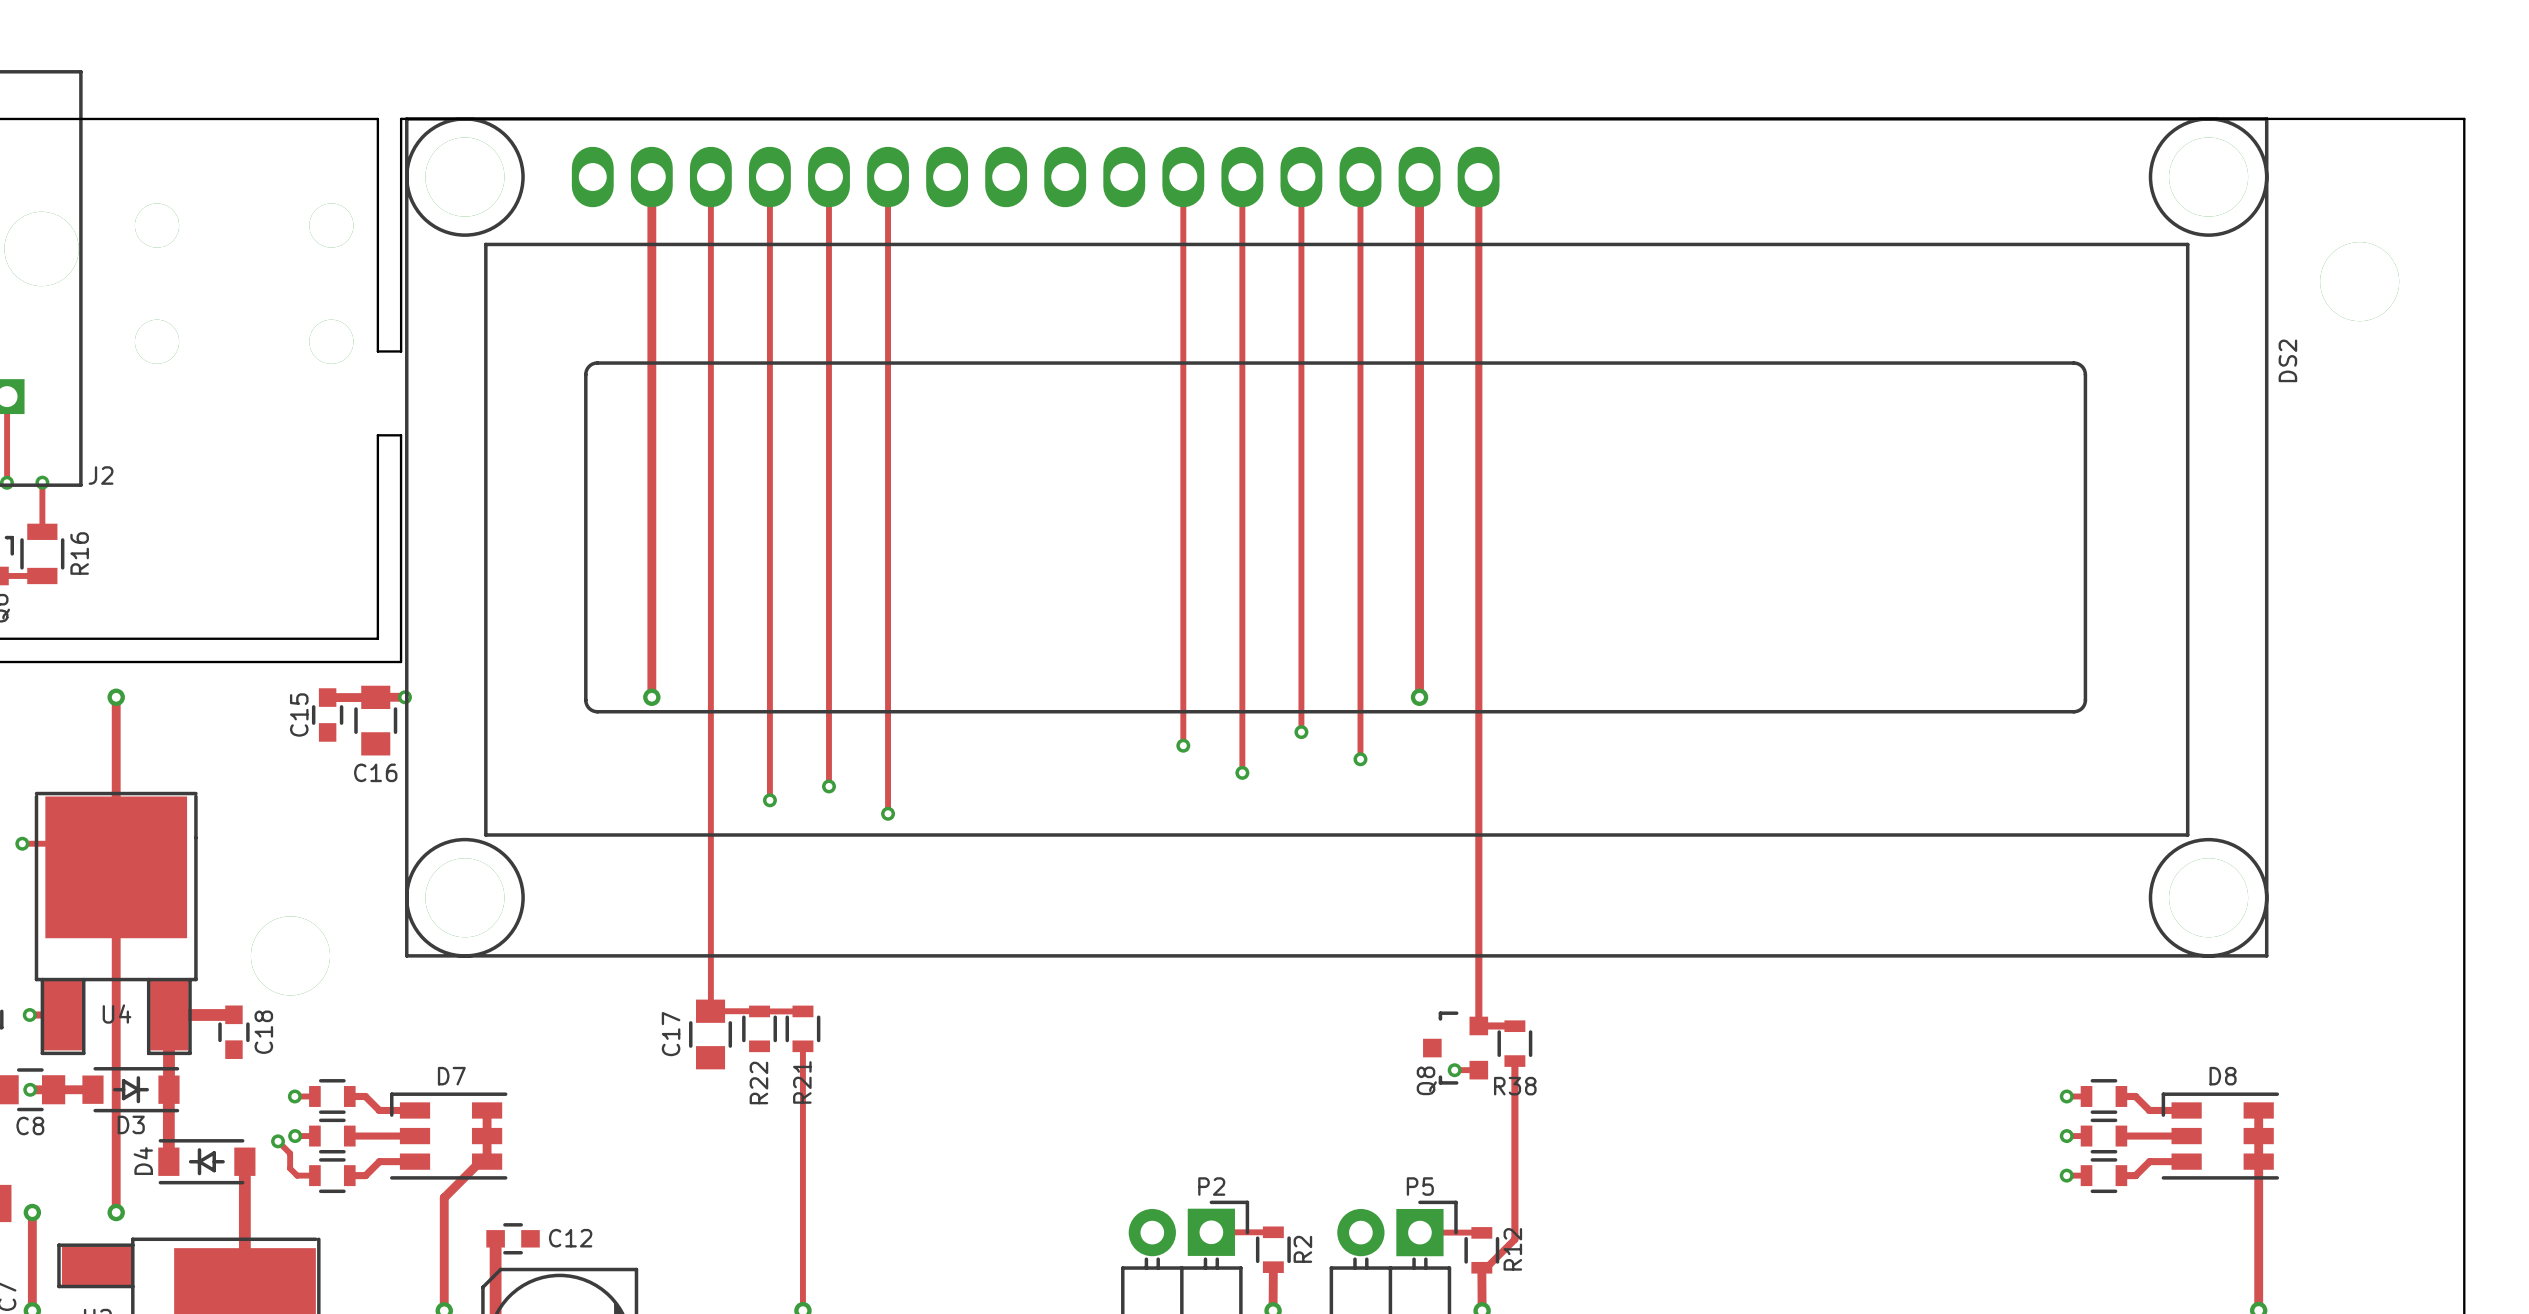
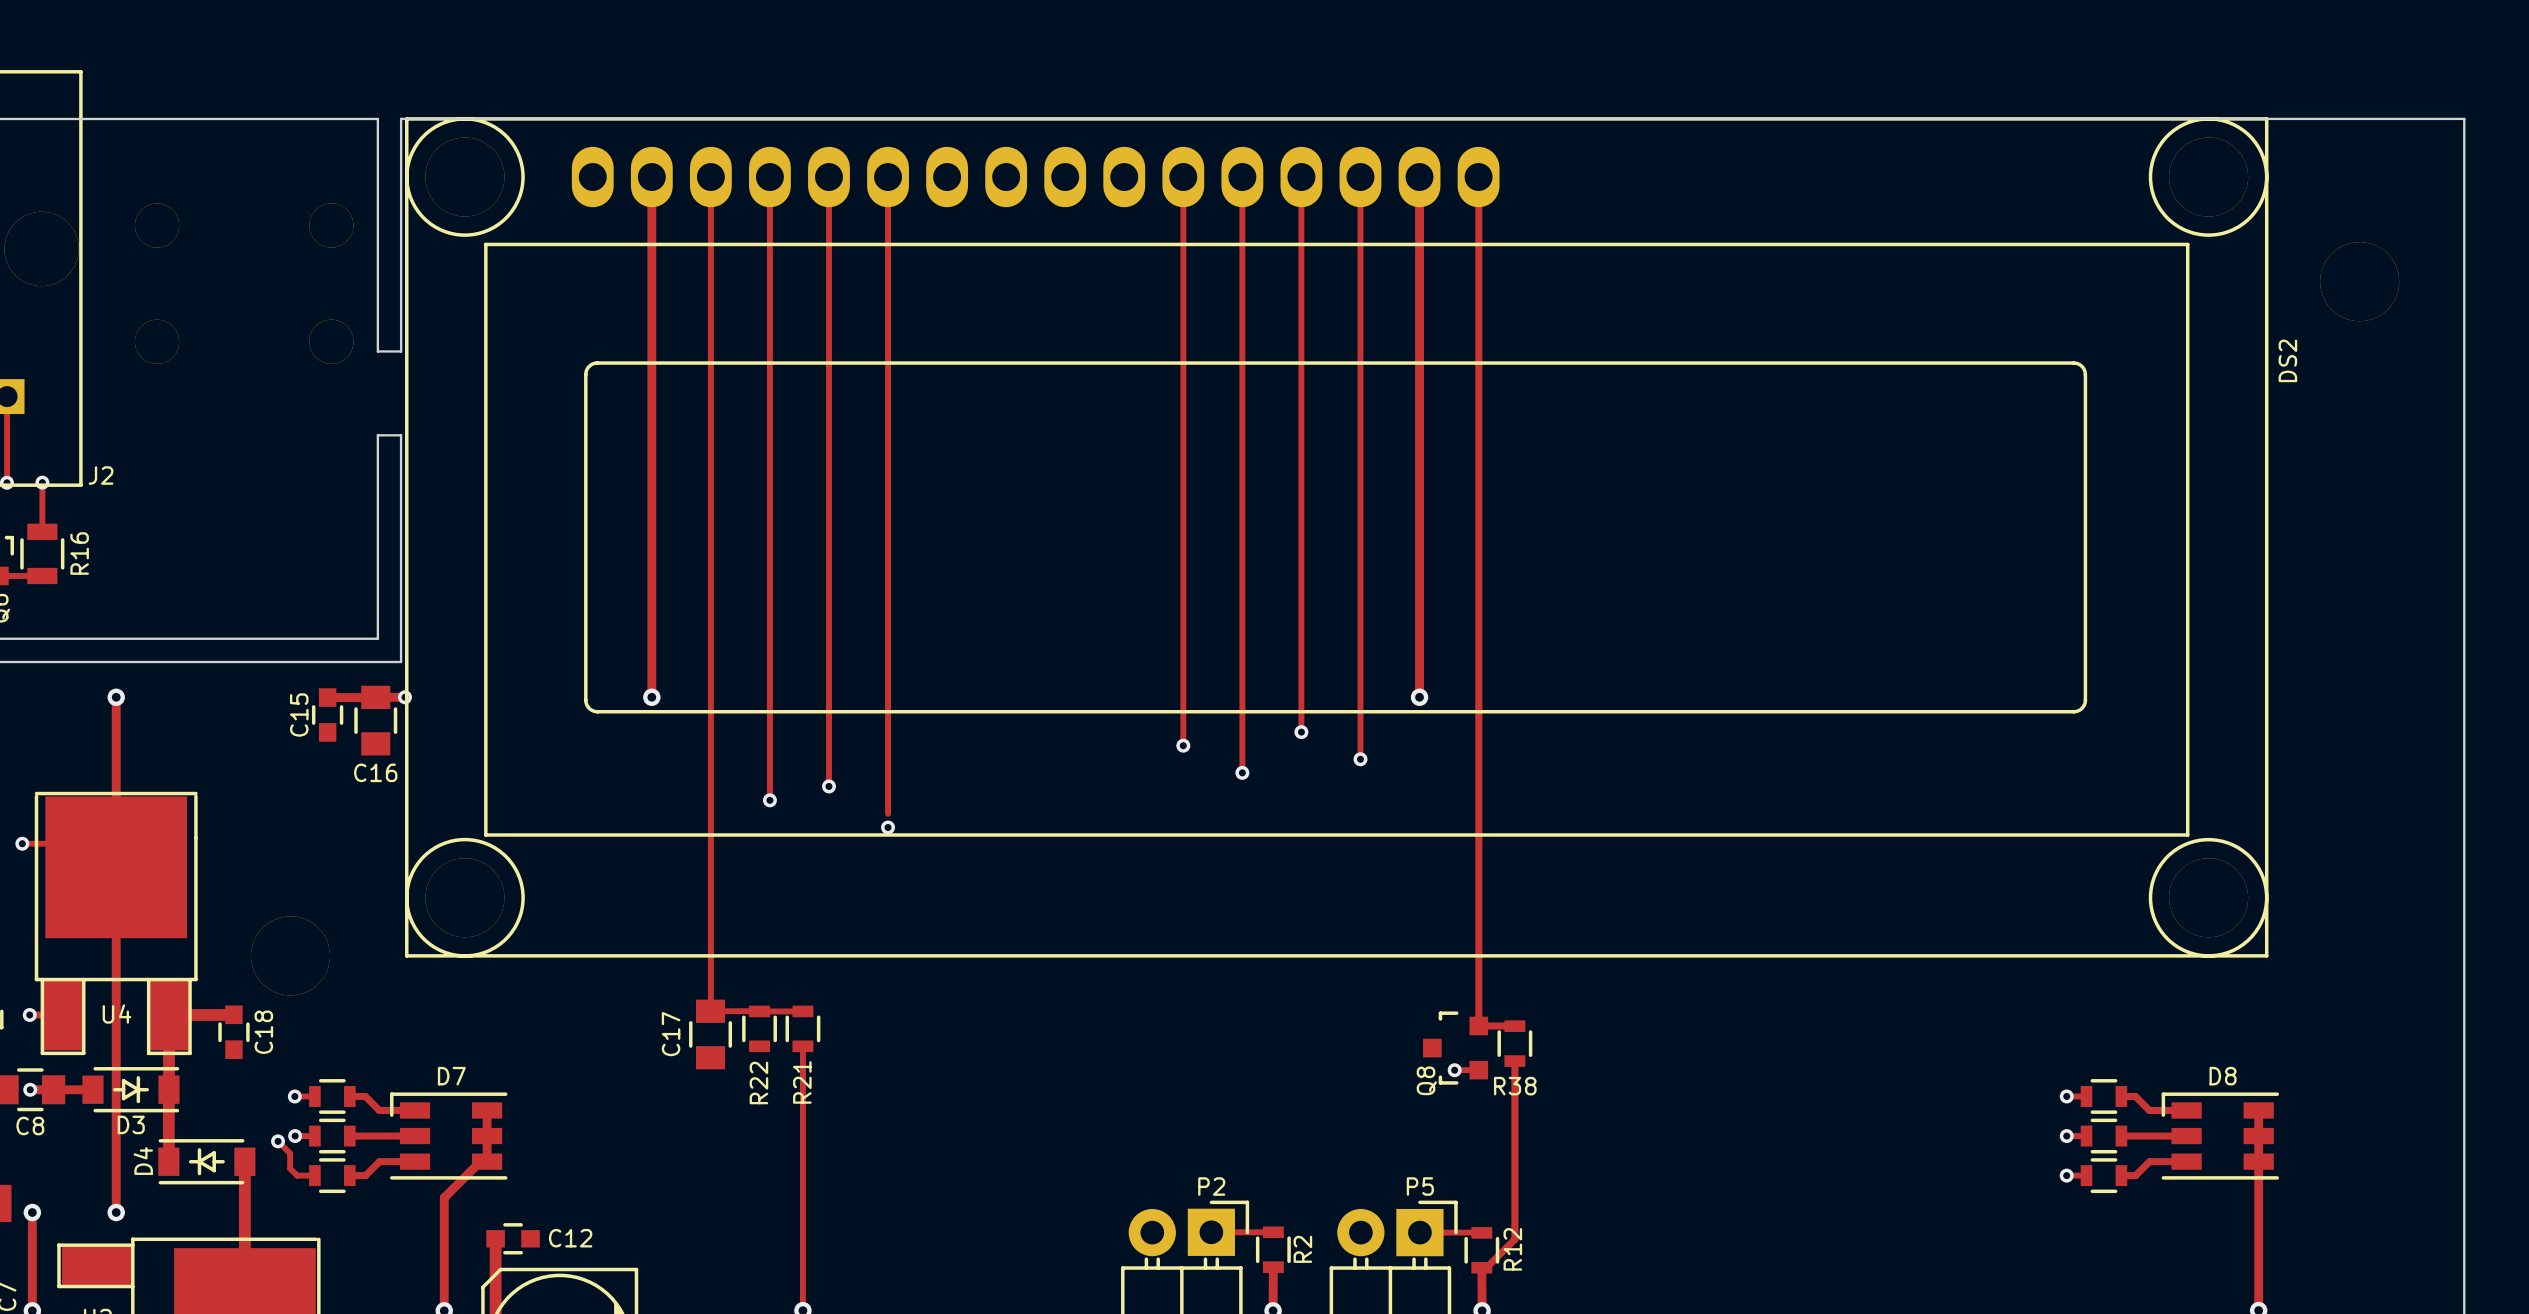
via position: (888, 813) -> (888, 827)

